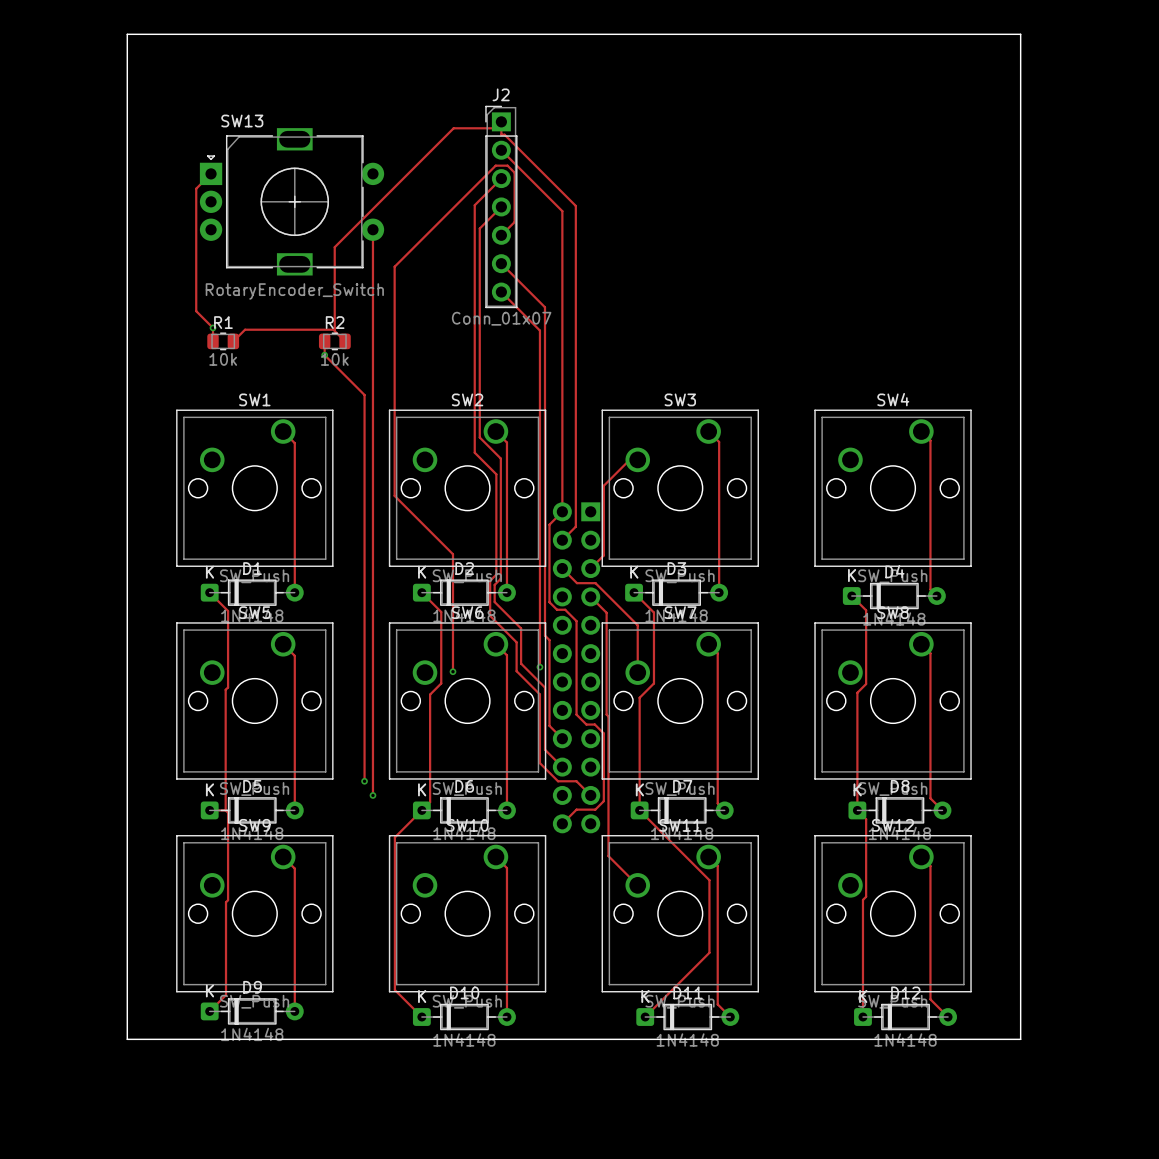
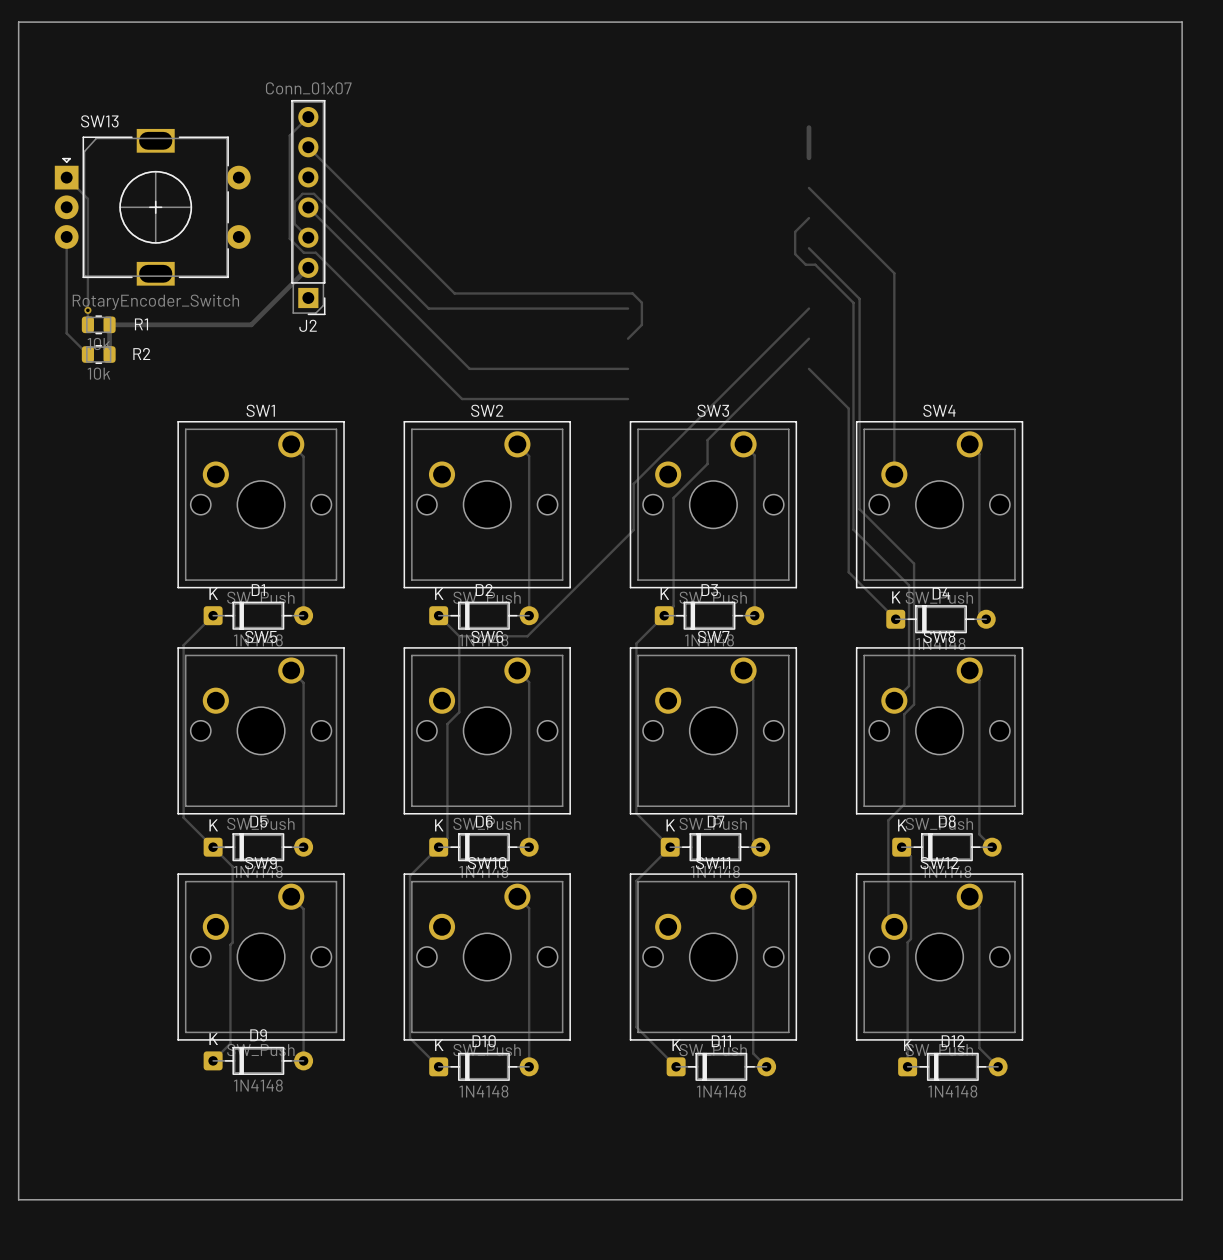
board edge: (127, 34) (127, 1039) (1020, 1039) (1020, 34) -> (125, 22) (18, 22) (18, 1199) (1182, 1199) (1182, 22) (1075, 22)
track: (501, 121) (501, 134) (504, 134) (575, 205) (575, 526) (562, 540) -> none
track: none -> (308, 117) (289, 135) (289, 238) (303, 252) (315, 252) (462, 399) (628, 399)
track: (501, 128) (453, 128) (334, 247) (334, 331) (345, 341) -> none
track: none -> (808, 127) (808, 157)
track: (501, 150) (562, 211) (562, 511) (549, 524) (549, 602) (557, 609) (565, 609) (576, 621) (576, 714) (586, 724) (594, 724) (603, 733) (603, 801) (595, 809) (576, 809) (562, 823) -> none
track: none -> (308, 147) (454, 293) (632, 293) (641, 302) (641, 324) (628, 338)
track: (211, 173) (196, 188) (196, 311) (213, 327) (213, 341) -> none
track: (501, 178) (474, 205) (474, 452) (496, 474) (496, 574) (490, 580) (490, 615) (516, 642) (516, 671) (539, 694) (539, 763) (558, 781) (576, 781) (590, 795) -> none
track: none -> (66, 177) (87, 198) (87, 324)
track: none -> (808, 187) (894, 273) (894, 474)
SW13 position: (292, 201) -> (152, 207)
track: (501, 206) (479, 228) (479, 437) (500, 458) (500, 578) (494, 584) (494, 602) (521, 628) (521, 663) (545, 687) (545, 749) (562, 767) -> none
J2 rotation: 0° (501, 206) -> 180° (308, 207)
J2 position: (501, 206) -> (308, 207)
track: none -> (308, 207) (469, 368) (628, 368)
track: none -> (808, 218) (795, 231) (795, 254) (805, 264) (815, 264) (853, 302) (853, 529) (909, 585) (909, 686) (894, 700)
track: (372, 229) (372, 795) -> none
track: (501, 235) (514, 222) (514, 172) (507, 165) (495, 165) (394, 266) (394, 495) (452, 554) (452, 671) -> none
track: none -> (66, 236) (66, 333) (87, 354)
track: none -> (308, 237) (294, 224) (294, 201) (302, 193) (314, 193) (428, 308) (628, 308)
track: none -> (808, 248) (859, 298) (859, 509) (914, 563) (914, 704) (904, 714) (904, 804) (888, 820) (888, 920) (894, 926)
track: (501, 263) (544, 307) (544, 635) (549, 640) (549, 725) (562, 738) -> none
track: none -> (308, 267) (251, 324) (109, 324) (109, 354)
track: (501, 292) (539, 330) (539, 667) -> none
track: none -> (808, 308) (633, 483) (633, 530) (527, 636) (459, 636)
via: none -> (87, 310)
R1 name position: R1 (223, 322) -> R1 (141, 324)
R2 name position: R2 (335, 322) -> R2 (141, 353)
via: (213, 327) -> none
track: (334, 329) (245, 329) (233, 341) -> none
R1 position: (223, 341) -> (98, 324)
track: (324, 341) (324, 355) (364, 395) (364, 781) -> none
R2 position: (334, 341) -> (98, 354)
via: (324, 355) -> none
track: (637, 459) (629, 459) (603, 485) (603, 555) (590, 568) -> none
track: (562, 568) (576, 583) (595, 583) (637, 625) (637, 672) -> none
track: (209, 592) (228, 611) (228, 687) (225, 689) (225, 810) (228, 812) (228, 828) -> (213, 615) (183, 645) (183, 817) (232, 866)
track: (634, 592) (653, 612) (653, 683) (639, 697) (639, 810) (709, 880) (709, 952) (645, 1017) -> (808, 338) (707, 440) (707, 463) (673, 497) (673, 606) (636, 643) (636, 813) (670, 847) (636, 880) (636, 1027) (676, 1066)
track: (590, 596) (606, 612) (608, 856) (637, 885) -> none
track: (851, 596) (866, 610) (866, 684) (857, 692) (857, 810) -> (895, 619) (848, 572) (848, 408) (808, 368)
via: (539, 667) -> none
part: (576, 667) -> none
via: (452, 671) -> none
via: (364, 781) -> none
via: (372, 795) -> none

